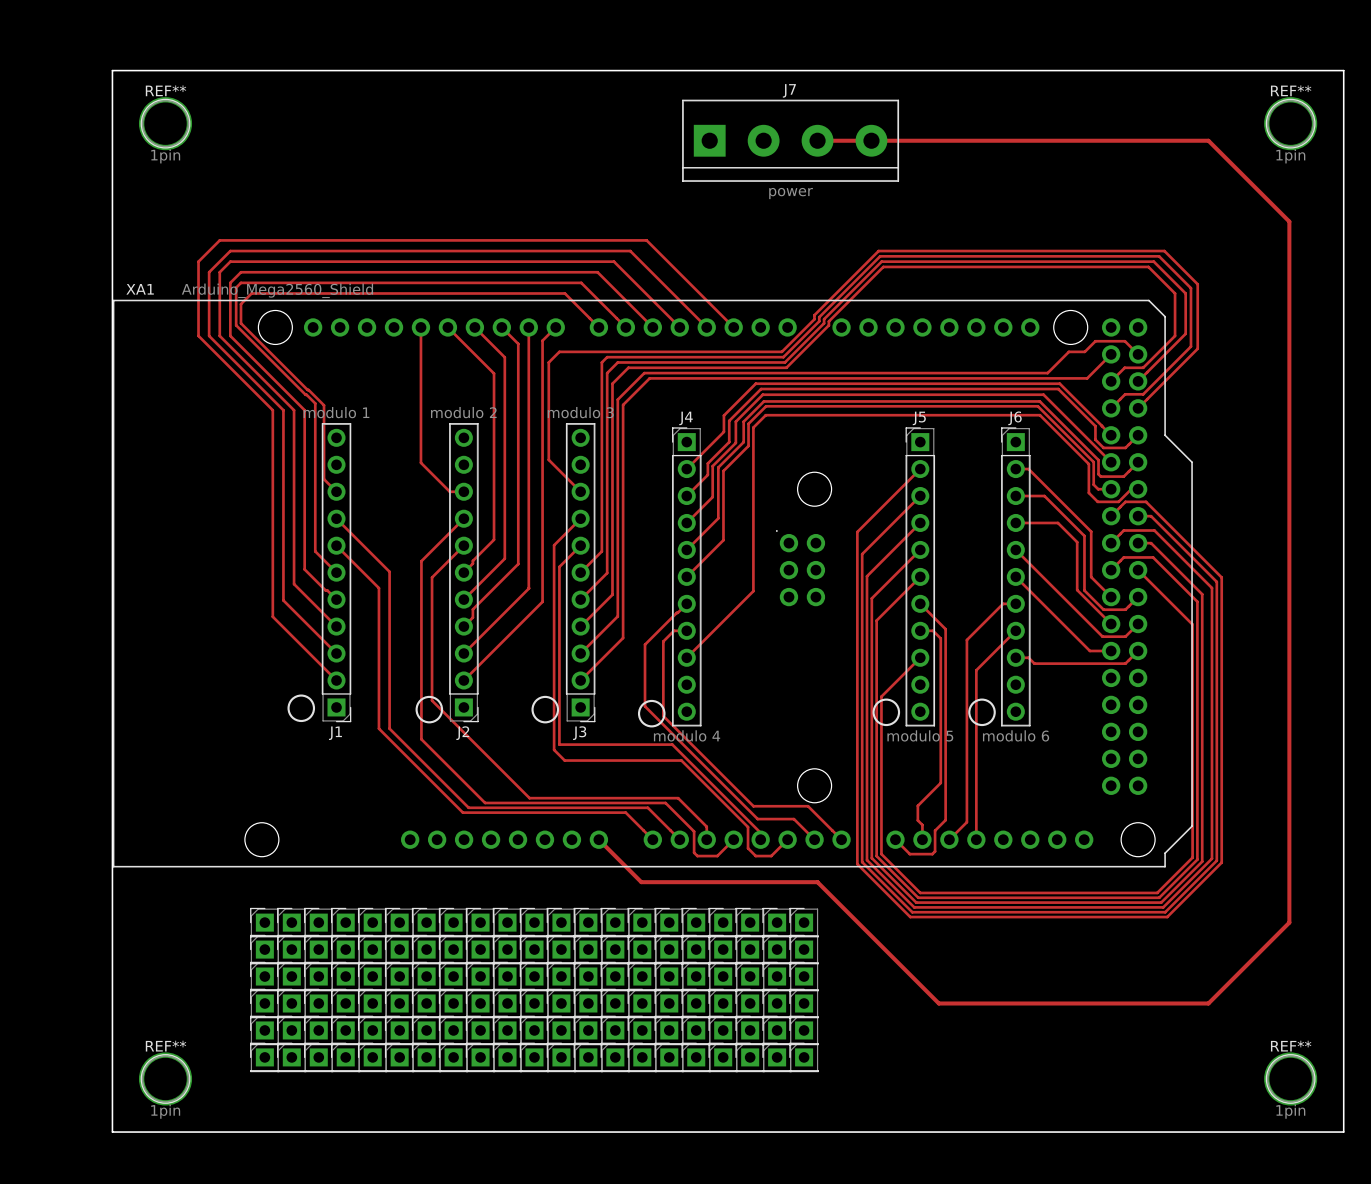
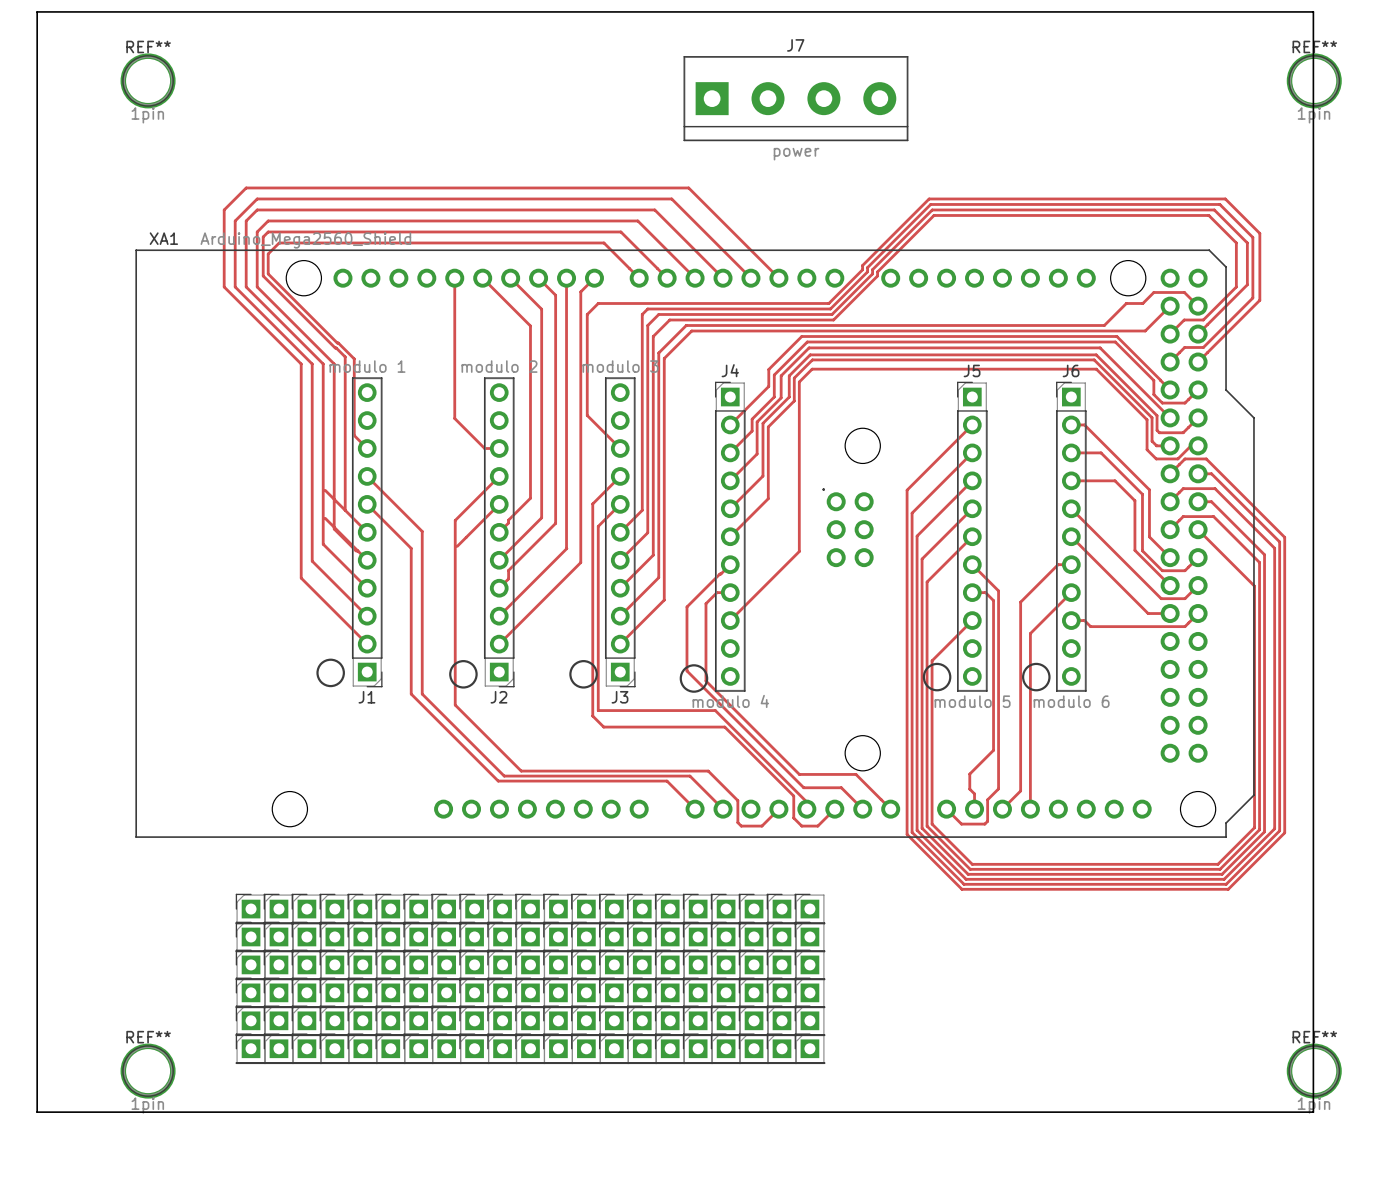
board edge: (112, 70) (112, 1132) (1343, 1132) (1343, 70) (112, 70) -> (37, 11) (37, 1112) (1313, 1112) (1313, 11) (37, 11)
top track: (817, 140) (1208, 140) (1289, 221) (1289, 922) (1208, 1003) (938, 1003) (817, 882) (641, 882) (598, 839) -> none
top track: (654, 248) (646, 240) (219, 240) (198, 261) (198, 335) (272, 410) (272, 616) (336, 680) -> none
top track: (638, 258) (630, 251) (230, 251) (209, 272) (209, 335) (283, 410) (283, 600) (336, 653) -> (637, 220) (268, 220) (257, 231) (257, 286) (334, 364) (334, 529) (357, 550)
top track: (621, 269) (613, 261) (230, 261) (219, 272) (219, 335) (294, 410) (294, 584) (313, 603) -> (620, 231) (268, 231) (263, 236) (263, 275) (345, 356) (345, 510)
top track: (605, 280) (597, 272) (240, 272) (230, 282) (230, 335) (304, 410) (304, 569) (327, 590) -> (603, 242) (279, 242) (268, 253) (268, 273) (354, 358) (354, 435) (367, 448)
top track: none -> (510, 278) (541, 309) (541, 517) (499, 560)
top track: none -> (594, 278) (580, 291) (580, 562) (499, 644)
top track: (639, 313) (652, 327) -> (482, 278) (496, 292)
top track: (666, 313) (679, 327) -> none
top track: (693, 313) (706, 327) -> none
top track: (720, 313) (733, 327) -> none
top track: none -> (750, 278) (671, 198) (257, 198) (235, 220) (235, 286) (312, 364) (312, 561) (315, 564)
top track: none -> (778, 278) (688, 187) (246, 187) (224, 209) (224, 286) (301, 364) (301, 578)
top track: (420, 327) (420, 462) (449, 491) (463, 491) -> (454, 278) (454, 418) (484, 448) (499, 448)
top track: (447, 327) (494, 373) (494, 539) (472, 560) (472, 563) -> (499, 504) (466, 536)
top track: (474, 327) (504, 357) (504, 558) -> (513, 309) (530, 325) (530, 498) (499, 531)
top track: (528, 327) (529, 588) (513, 604) -> (538, 278) (555, 295) (555, 523) (508, 570) (508, 578)
top track: (555, 327) (542, 340) (542, 601) -> (566, 278) (566, 548) (538, 576)
top track: (598, 327) (564, 293) (251, 293) (240, 304) (240, 323) (324, 405) (324, 479) (336, 491) -> none
top track: (625, 327) (581, 282) (240, 282) (236, 287) (236, 325) (315, 403) (315, 551) (334, 570) -> (654, 209) (257, 209) (246, 220) (246, 286) (323, 364) (323, 544)
top track: none -> (1170, 306) (1145, 331) (691, 331) (664, 358) (664, 600) (620, 644)
top track: (518, 343) (518, 564) (472, 609) (472, 617) (463, 626) -> none
top track: (1197, 348) (1197, 284) (1164, 251) (878, 251) (814, 315) (814, 319) (781, 351) (559, 351) (548, 362) (548, 459) (580, 491) -> (1217, 314) (1247, 284) (1247, 242) (1214, 209) (932, 209) (872, 269) (872, 273) (832, 314) (658, 314) (647, 325) (647, 532) (620, 560)
top track: (1111, 354) (1087, 378) (649, 378) (623, 404) (623, 638) -> (1198, 306) (1184, 292) (1153, 292) (1142, 303) (1126, 303) (1104, 325) (686, 325) (658, 353) (658, 577) (622, 614)
top track: (1138, 354) (1124, 341) (1095, 341) (1084, 351) (1068, 351) (1047, 373) (644, 373) (617, 399) (617, 616) (580, 653) -> none
top track: (1165, 354) (1185, 333) (1185, 293) (1153, 261) (881, 261) (824, 319) (824, 323) (784, 362) (617, 362) (607, 373) (607, 573) (580, 599) -> (1184, 319) (1203, 319) (1236, 286) (1236, 242) (1208, 215) (934, 215) (877, 271) (877, 275) (833, 319) (669, 319) (653, 336) (653, 555) (620, 588)
top track: (1151, 367) (1138, 381) -> none
top track: (1178, 367) (1165, 380) -> (620, 532) (642, 510) (642, 314) (647, 308) (830, 308) (867, 271) (867, 267) (930, 204) (1219, 204) (1252, 237) (1252, 297) (1203, 347) (1184, 347)
top track: (1111, 381) (1124, 367) (1143, 367) (1175, 335) (1175, 293) (1148, 266) (883, 266) (828, 321) (828, 325) (786, 367) (628, 367) (612, 383) (612, 594) (580, 626) -> none
top track: (1151, 394) (1138, 408) -> none
top track: none -> (1198, 362) (1259, 300) (1259, 233) (1225, 198) (929, 198) (862, 265) (862, 269) (828, 303) (598, 303) (587, 314) (587, 415) (620, 448)
top track: (1111, 408) (1125, 394) (1143, 394) (1190, 346) (1190, 288) (1159, 256) (880, 256) (819, 317) (819, 321) (783, 357) (607, 357) (601, 362) (601, 551) -> (620, 504) (600, 524)
top track: (1111, 435) (1059, 383) (755, 383) (723, 415) (723, 431) (686, 469) -> (1170, 389) (1116, 336) (801, 336) (768, 369) (768, 386) (730, 424)
top track: (1138, 435) (1125, 447) (1103, 447) (1095, 439) (1095, 426) (1058, 389) (761, 389) (729, 420) (729, 442) (707, 463) (707, 474) (686, 496) -> (1198, 389) (1184, 403) (1162, 403) (1153, 394) (1153, 380) (1115, 342) (807, 342) (774, 375) (774, 397) (752, 419) (752, 431) (730, 452)
top track: none -> (972, 424) (930, 466)
top track: none -> (1071, 424) (1084, 424) (1149, 489) (1149, 536) (1156, 543)
top track: (1111, 462) (1043, 394) (762, 394) (735, 421) (735, 442) (712, 466) (712, 497) (686, 522) -> (1170, 417) (1100, 347) (809, 347) (781, 375) (781, 397) (757, 421) (757, 454) (730, 480)
top track: (1138, 462) (1123, 476) (1100, 476) (1098, 474) (1098, 460) (1039, 401) (763, 401) (743, 421) (743, 442) (718, 467) (718, 518) (686, 549) -> (1198, 417) (1183, 432) (1159, 432) (1157, 430) (1157, 415) (1096, 354) (810, 354) (789, 375) (789, 397) (762, 423) (762, 476) (730, 508)
top track: (920, 469) (857, 532) (857, 864) (910, 917) (1167, 917) (1221, 862) (1221, 577) (1146, 501) (1125, 501) (1111, 516) -> none
top track: (1015, 469) (1028, 469) (1091, 531) (1091, 577) (1111, 597) -> none
top track: none -> (972, 452) (930, 494)
top track: (1111, 489) (1098, 489) (1093, 484) (1093, 462) (1037, 406) (766, 406) (748, 423) (748, 445) (723, 471) (723, 540) (686, 576) -> (1170, 445) (1156, 445) (1152, 441) (1152, 417) (1094, 359) (812, 359) (794, 378) (794, 401) (768, 426) (768, 498) (730, 536)
top track: (1138, 489) (1131, 489) (1118, 501) (1097, 501) (1088, 492) (1088, 464) (1039, 415) (765, 415) (753, 427) (753, 591) (686, 657) -> (1198, 445) (1191, 445) (1177, 458) (1156, 458) (1147, 449) (1147, 419) (1096, 369) (812, 369) (799, 382) (799, 551) (730, 620)
top track: (1015, 496) (1044, 496) (1084, 535) (1084, 590) (1103, 609) (1125, 609) (1138, 597) -> (1071, 452) (1101, 452) (1142, 494) (1142, 550) (1162, 570) (1184, 570) (1198, 557)
top track: none -> (367, 476) (422, 531) (422, 694) (504, 776) (689, 776) (723, 809)
top track: none -> (972, 480) (930, 522)
top track: (1138, 516) (1151, 516) (1216, 581) (1216, 860) (1165, 912) (912, 912) (862, 862) (862, 554) (897, 518) -> (1170, 473) (1184, 458) (1206, 458) (1284, 537) (1284, 832) (1228, 889) (961, 889) (907, 834) (907, 490)
top track: (463, 518) (421, 561) (421, 739) (485, 802) (665, 802) (694, 831) (694, 852) (697, 856) (717, 856) (733, 839) -> none
top track: (580, 518) (554, 545) (554, 749) (564, 760) (681, 760) (748, 827) (748, 848) (755, 856) (771, 856) (787, 839) -> (620, 476) (592, 503) (592, 716) (603, 727) (724, 727) (793, 796) (793, 818) (801, 826) (817, 826) (834, 809)
top track: (1015, 522) (1057, 522) (1077, 542) (1077, 590) (1111, 624) -> (1071, 480) (1115, 480) (1134, 500) (1134, 550) (1170, 585)
top track: none -> (367, 504) (411, 548) (411, 694) (498, 781) (667, 781) (695, 809)
top track: none -> (972, 508) (930, 550)
top track: (902, 540) (867, 576) (867, 860) (914, 907) (1163, 907) (1212, 858) (1212, 588) (1154, 530) (1123, 530) (1111, 543) -> (912, 513) (912, 832) (964, 884) (1226, 884) (1279, 830) (1279, 541) (1211, 473) (1198, 473)
top track: (1138, 543) (1151, 543) (1202, 594) (1202, 861) (1161, 902) (916, 902) (871, 858) (871, 598) (907, 562) -> (1170, 501) (1183, 488) (1215, 488) (1274, 548) (1274, 828) (1224, 879) (966, 879) (917, 830) (917, 536)
top track: (580, 545) (559, 566) (559, 744) (672, 744) (760, 832) (760, 839) -> none
top track: (461, 547) (432, 577) (432, 700) (529, 798) (678, 798) (706, 826) (706, 839) -> (455, 520) (455, 705) (521, 771) (708, 771) (737, 800) (737, 822) (741, 826) (761, 826) (778, 809)
top track: (1015, 549) (1102, 636) (1125, 636) (1138, 624) -> (1071, 508) (1161, 598) (1184, 598) (1198, 585)
top track: (599, 553) (580, 572) -> (598, 526) (598, 710) (715, 710) (806, 802) (806, 809)
top track: none -> (1170, 529) (1183, 516) (1213, 516) (1259, 562) (1259, 829) (1220, 869) (970, 869) (927, 826) (927, 582) (972, 536)
top track: none -> (1198, 529) (1254, 586) (1254, 827) (1217, 864) (972, 864) (932, 824) (932, 660) (972, 620)
top track: (376, 559) (389, 571) (389, 728) (468, 807) (647, 807) (679, 839) -> none
top track: (504, 559) (463, 599) -> (499, 476) (457, 518)
top track: (1111, 570) (1123, 557) (1153, 557) (1197, 601) (1197, 859) (1159, 897) (918, 897) (876, 856) (876, 620) (912, 584) -> (1198, 501) (1211, 501) (1264, 554) (1264, 831) (1222, 874) (968, 874) (922, 828) (922, 559)
top track: none -> (325, 546) (367, 588)
J1 position: (336, 572) -> (367, 532)
J2 position: (463, 572) -> (499, 532)
J3 position: (580, 572) -> (620, 532)
J4 position: (686, 576) -> (730, 536)
J5 position: (920, 576) -> (972, 536)
top track: (1015, 576) (1089, 650) (1111, 650) -> (1071, 536) (1148, 613) (1170, 613)
J6 position: (1015, 576) -> (1071, 536)
XA1 position: (652, 583) -> (695, 543)
top track: (1151, 583) (1192, 624) (1192, 857) (1157, 892) (920, 892) (881, 854) (881, 696) (920, 657) -> none
top track: (376, 586) (378, 588) (378, 728) (462, 812) (625, 812) (652, 839) -> none
top track: none -> (325, 574) (367, 616)
top track: (686, 603) (645, 644) (645, 706) (757, 819) (793, 819) (814, 839) -> (730, 564) (686, 606) (686, 670) (803, 787) (841, 787) (862, 809)
top track: (920, 603) (945, 629) (945, 820) (935, 830) (935, 851) (932, 854) (909, 854) (895, 839) -> (972, 564) (998, 590) (998, 788) (987, 799) (987, 821) (984, 824) (961, 824) (946, 809)
top track: (1015, 603) (1003, 603) (966, 640) (966, 822) (949, 839) -> (1071, 564) (1058, 564) (1020, 602) (1020, 790) (1002, 809)
top track: (504, 613) (463, 653) -> none
top track: none -> (325, 602) (367, 644)
top track: (686, 630) (674, 630) (663, 641) (663, 716) (753, 806) (808, 806) (841, 839) -> (730, 592) (717, 592) (705, 603) (705, 681) (799, 774) (856, 774) (890, 809)
top track: (920, 630) (933, 630) (940, 638) (940, 782) (917, 805) (917, 820) (922, 825) (922, 839) -> (972, 592) (985, 592) (993, 600) (993, 750) (969, 774) (969, 789) (974, 793) (974, 809)
top track: (1015, 630) (976, 670) (976, 839) -> (1071, 592) (1030, 633) (1030, 809)
top track: (504, 640) (463, 680) -> none
top track: (621, 640) (580, 680) -> none
top track: (1138, 650) (1125, 663) (1034, 663) (1028, 657) (1015, 657) -> (1198, 613) (1184, 626) (1090, 626) (1084, 620) (1071, 620)
drawing: none -> [449, 660, 478, 689]
drawing: none -> [569, 660, 598, 689]
drawing: none -> [922, 662, 952, 692]
drawing: none -> [1022, 662, 1051, 692]
drawing: none -> [679, 664, 709, 693]
drawing: [415, 695, 444, 724] -> none
drawing: [531, 695, 560, 724] -> none
drawing: [872, 698, 901, 727] -> none
drawing: [968, 698, 996, 727] -> none
drawing: [637, 699, 666, 728] -> none
drawing position: (301, 708) -> (330, 672)

